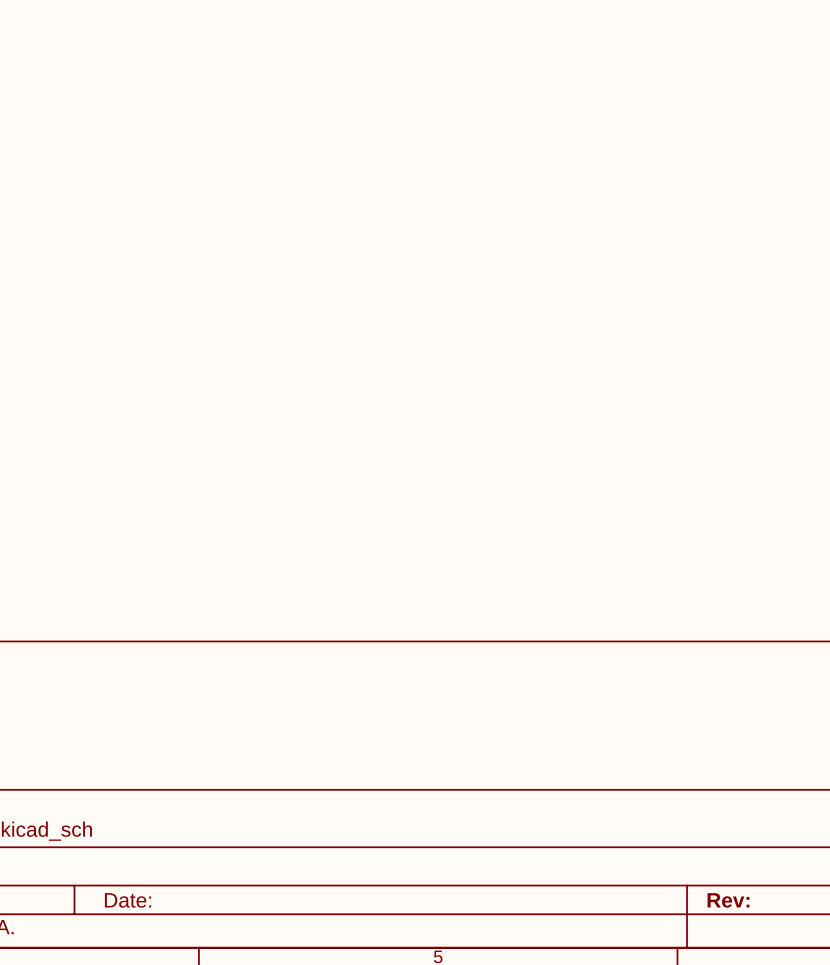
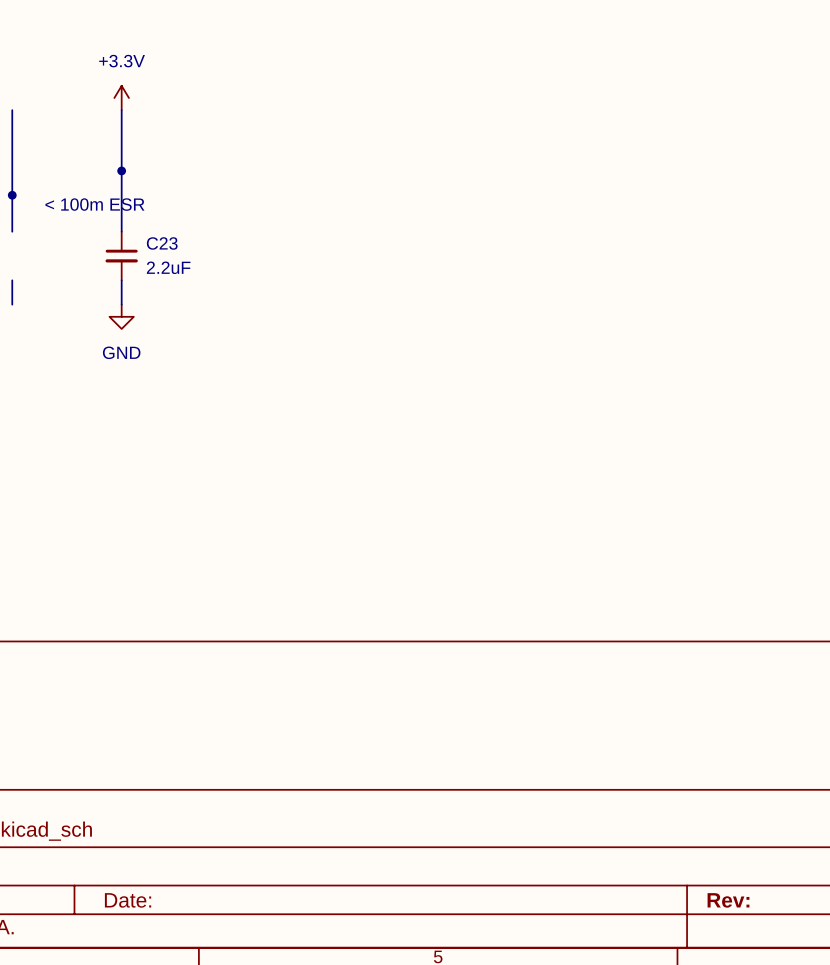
power symbol: none -> +3.3V (121, 98)
wire: none -> (12, 110) (12, 231)
wire: none -> (121, 110) (121, 231)
junction: none -> (121, 170)
junction: none -> (12, 195)
text: none -> < 100m ESR (94, 204)
C23: none -> 2.2uF (121, 256)
wire: none -> (12, 280) (12, 304)
wire: none -> (121, 280) (121, 304)
power symbol: none -> GND (121, 316)

